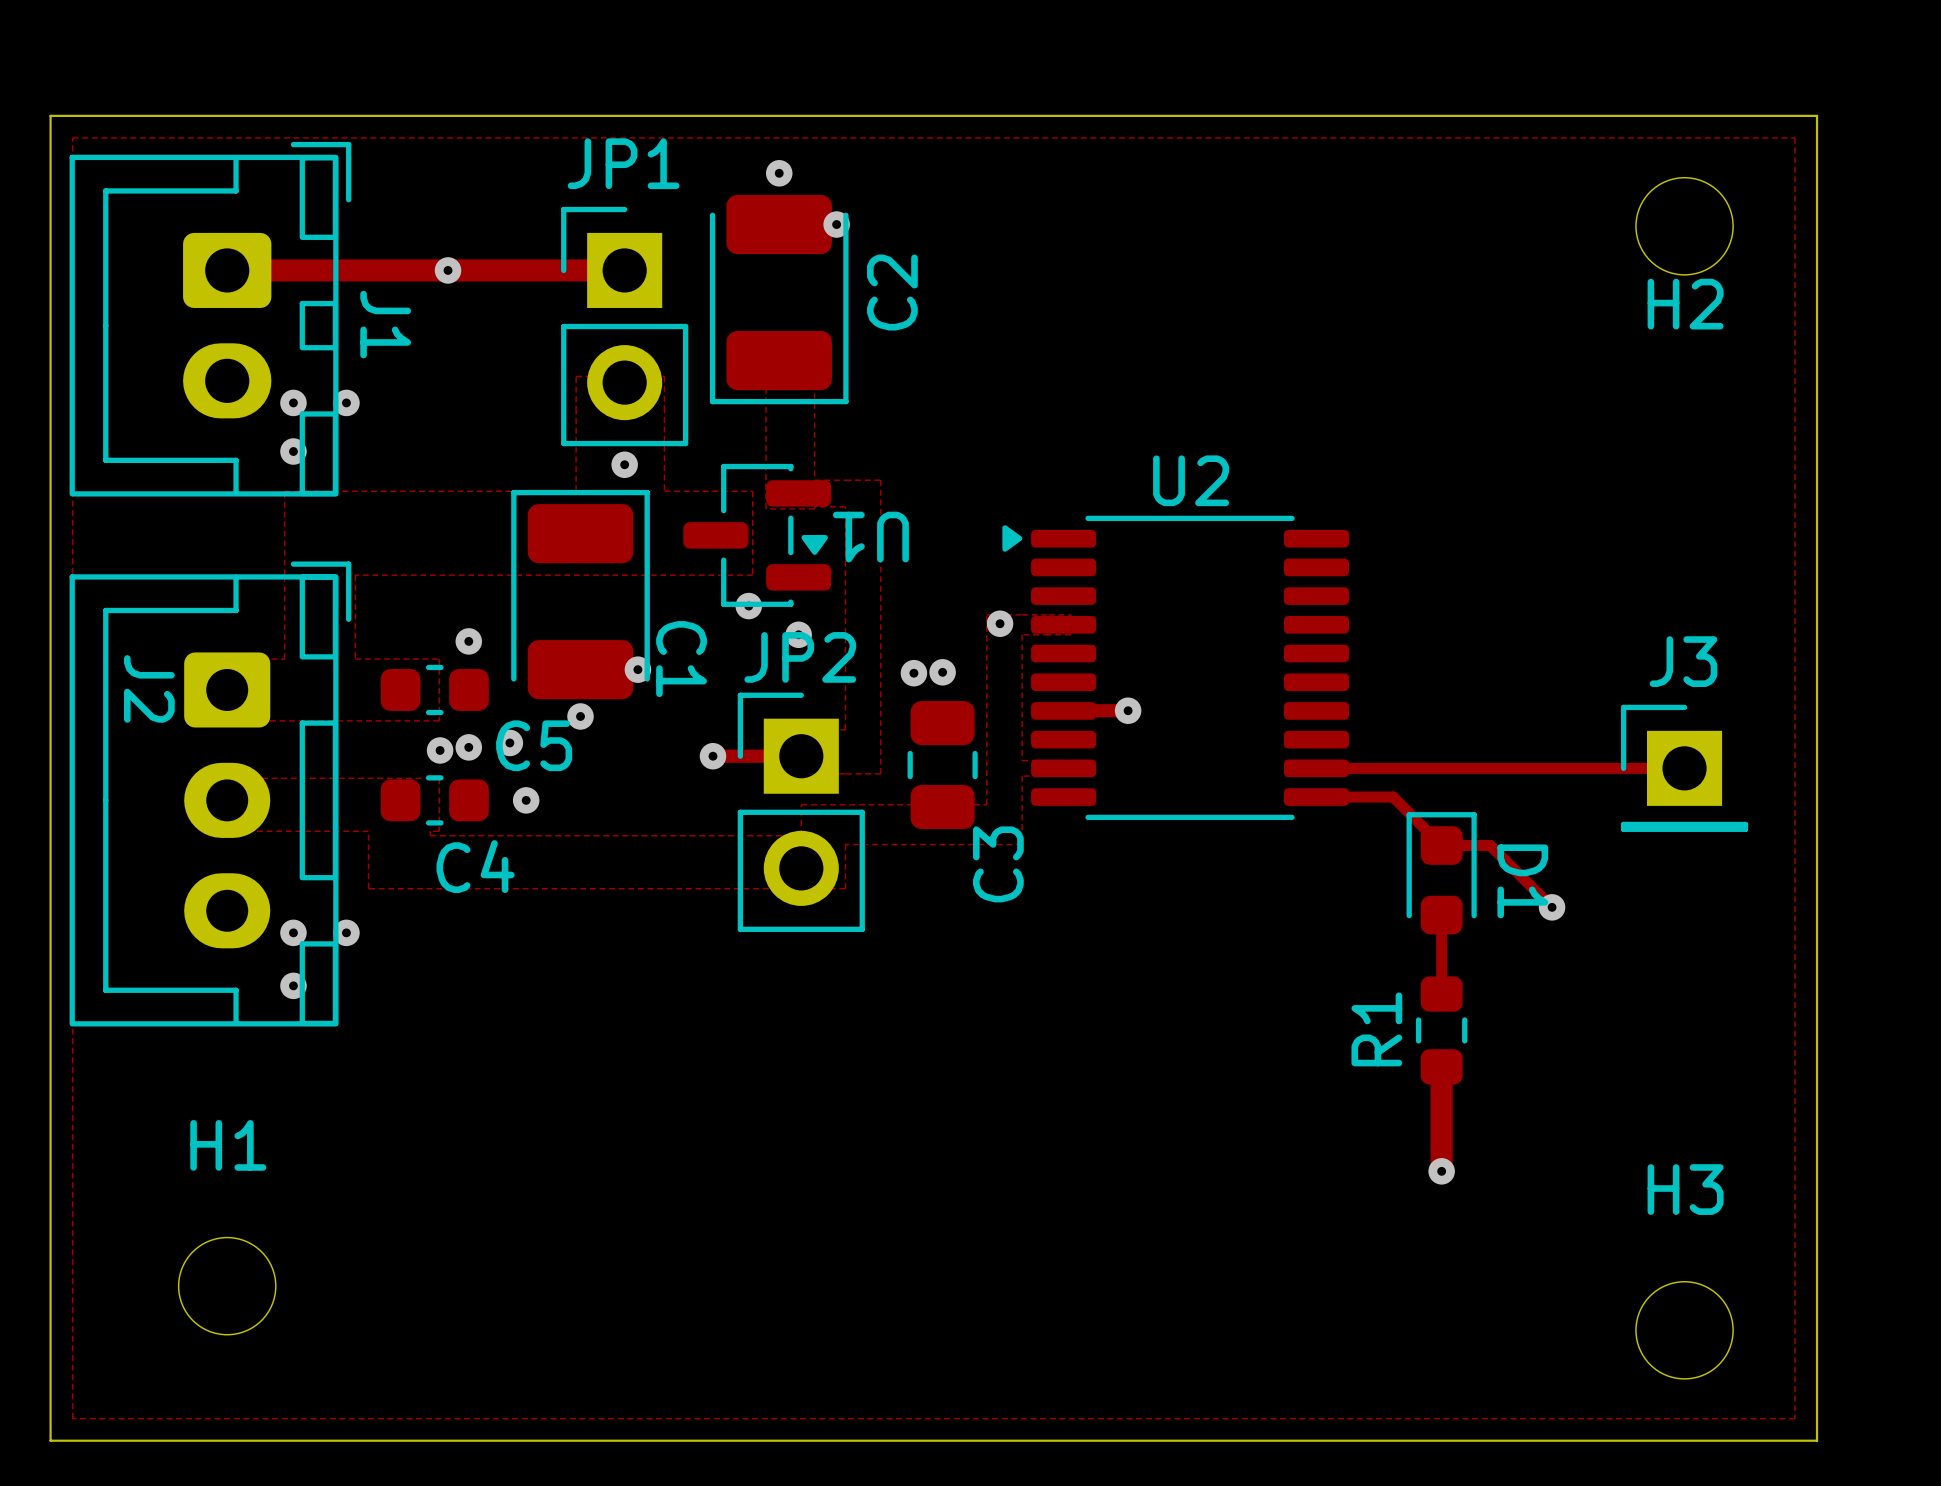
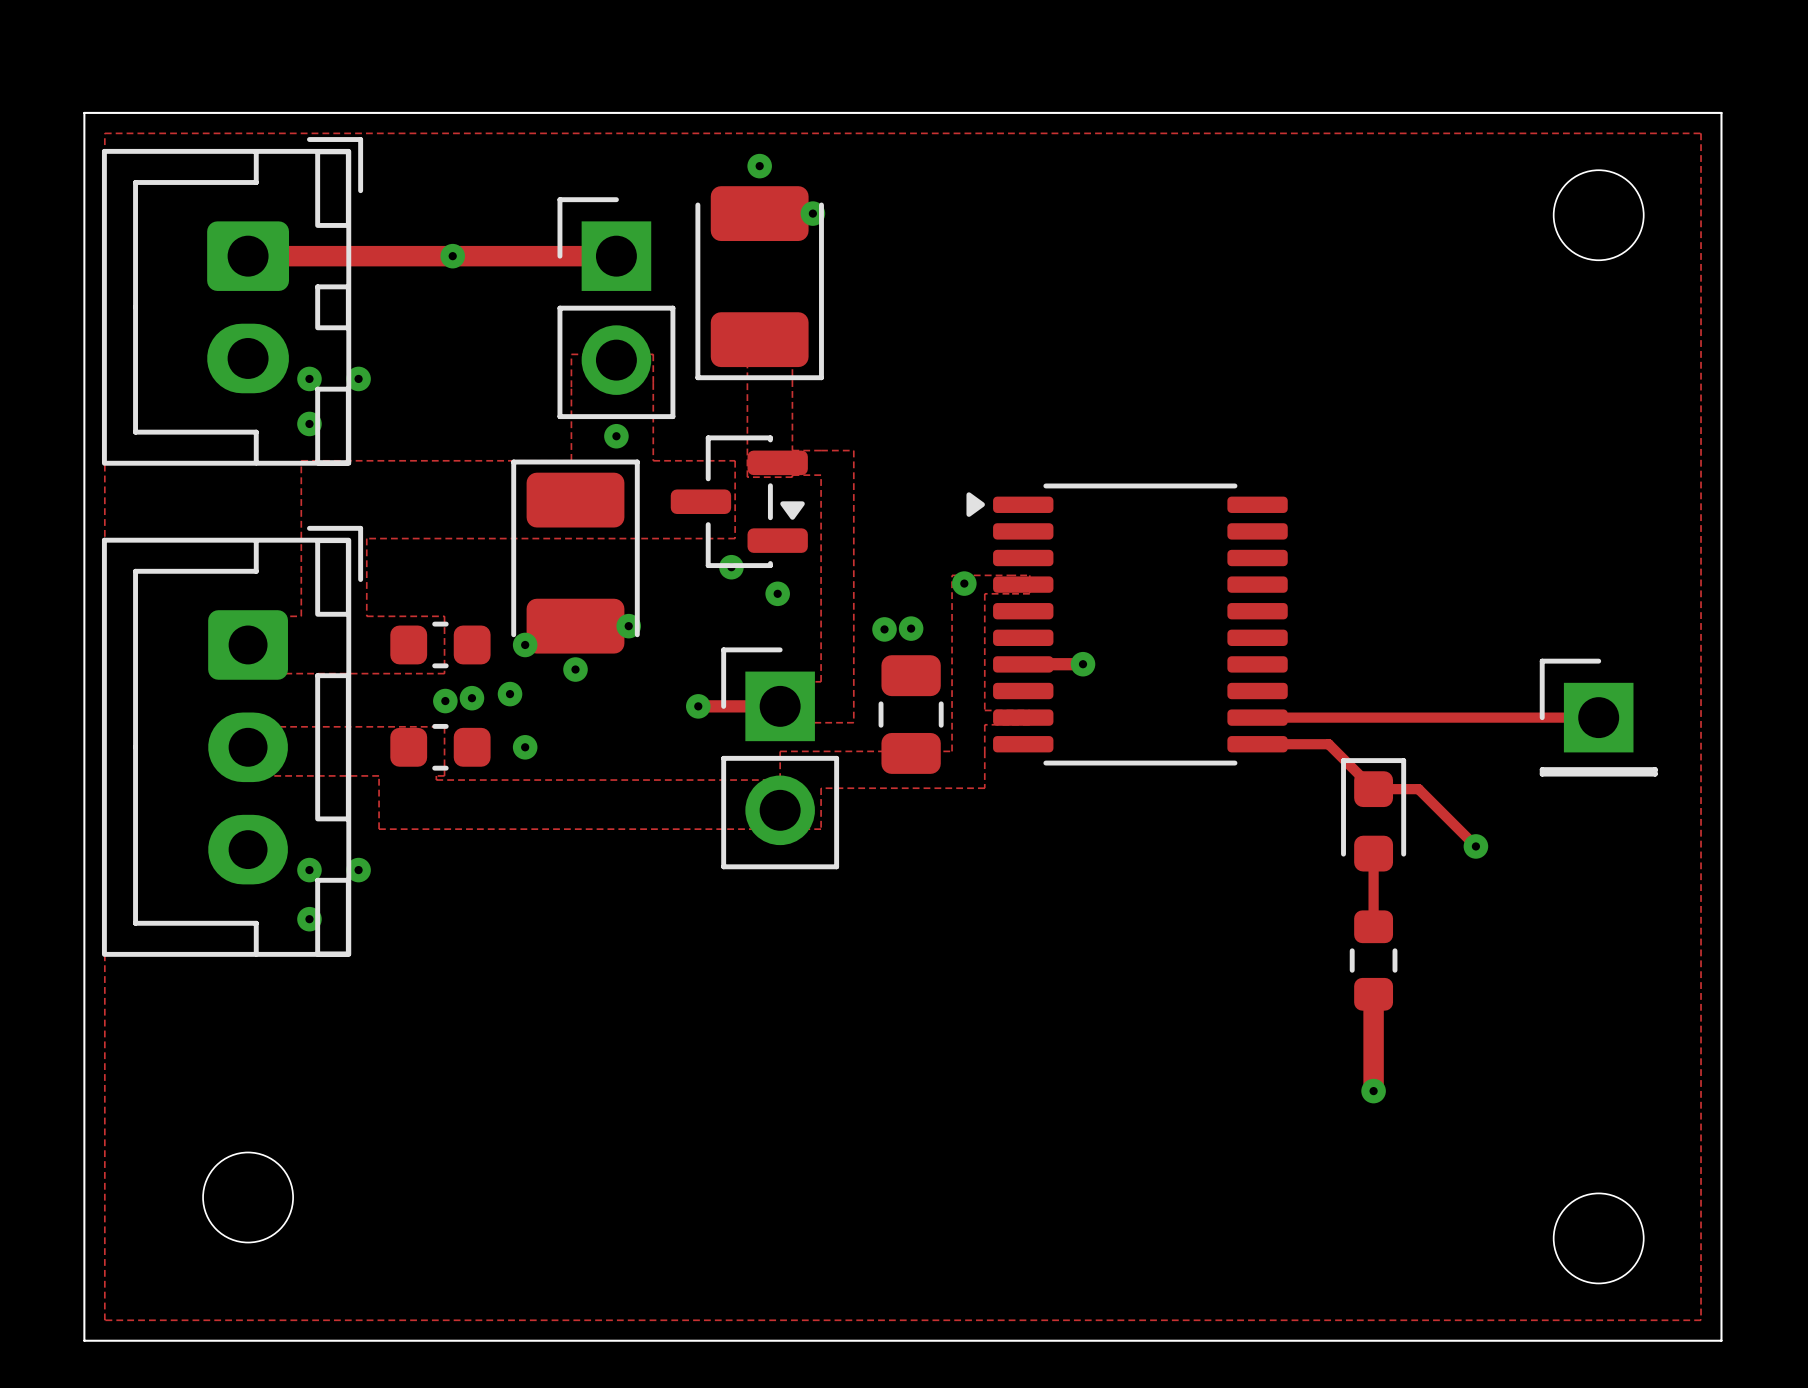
JP1 name: JP1 (623, 163) -> none
C2 name: C2 (892, 292) -> none
H2 name: H2 (1685, 304) -> none
J1 name: J1 (385, 324) -> none
U2 name: U2 (1191, 480) -> none
U1 name: U1 (870, 537) -> none
via position: (468, 641) -> (525, 644)
JP2 name: JP2 (800, 657) -> none
C1 name: C1 (681, 659) -> none
J3 name: J3 (1683, 661) -> none
J2 name: J2 (149, 688) -> none
C5 name: C5 (534, 745) -> none
C3 name: C3 (998, 864) -> none
C4 name: C4 (475, 866) -> none
D1 name: D1 (1522, 881) -> none
R1 name: R1 (1376, 1029) -> none
H1 name: H1 (228, 1145) -> none
H3 name: H3 (1685, 1189) -> none

